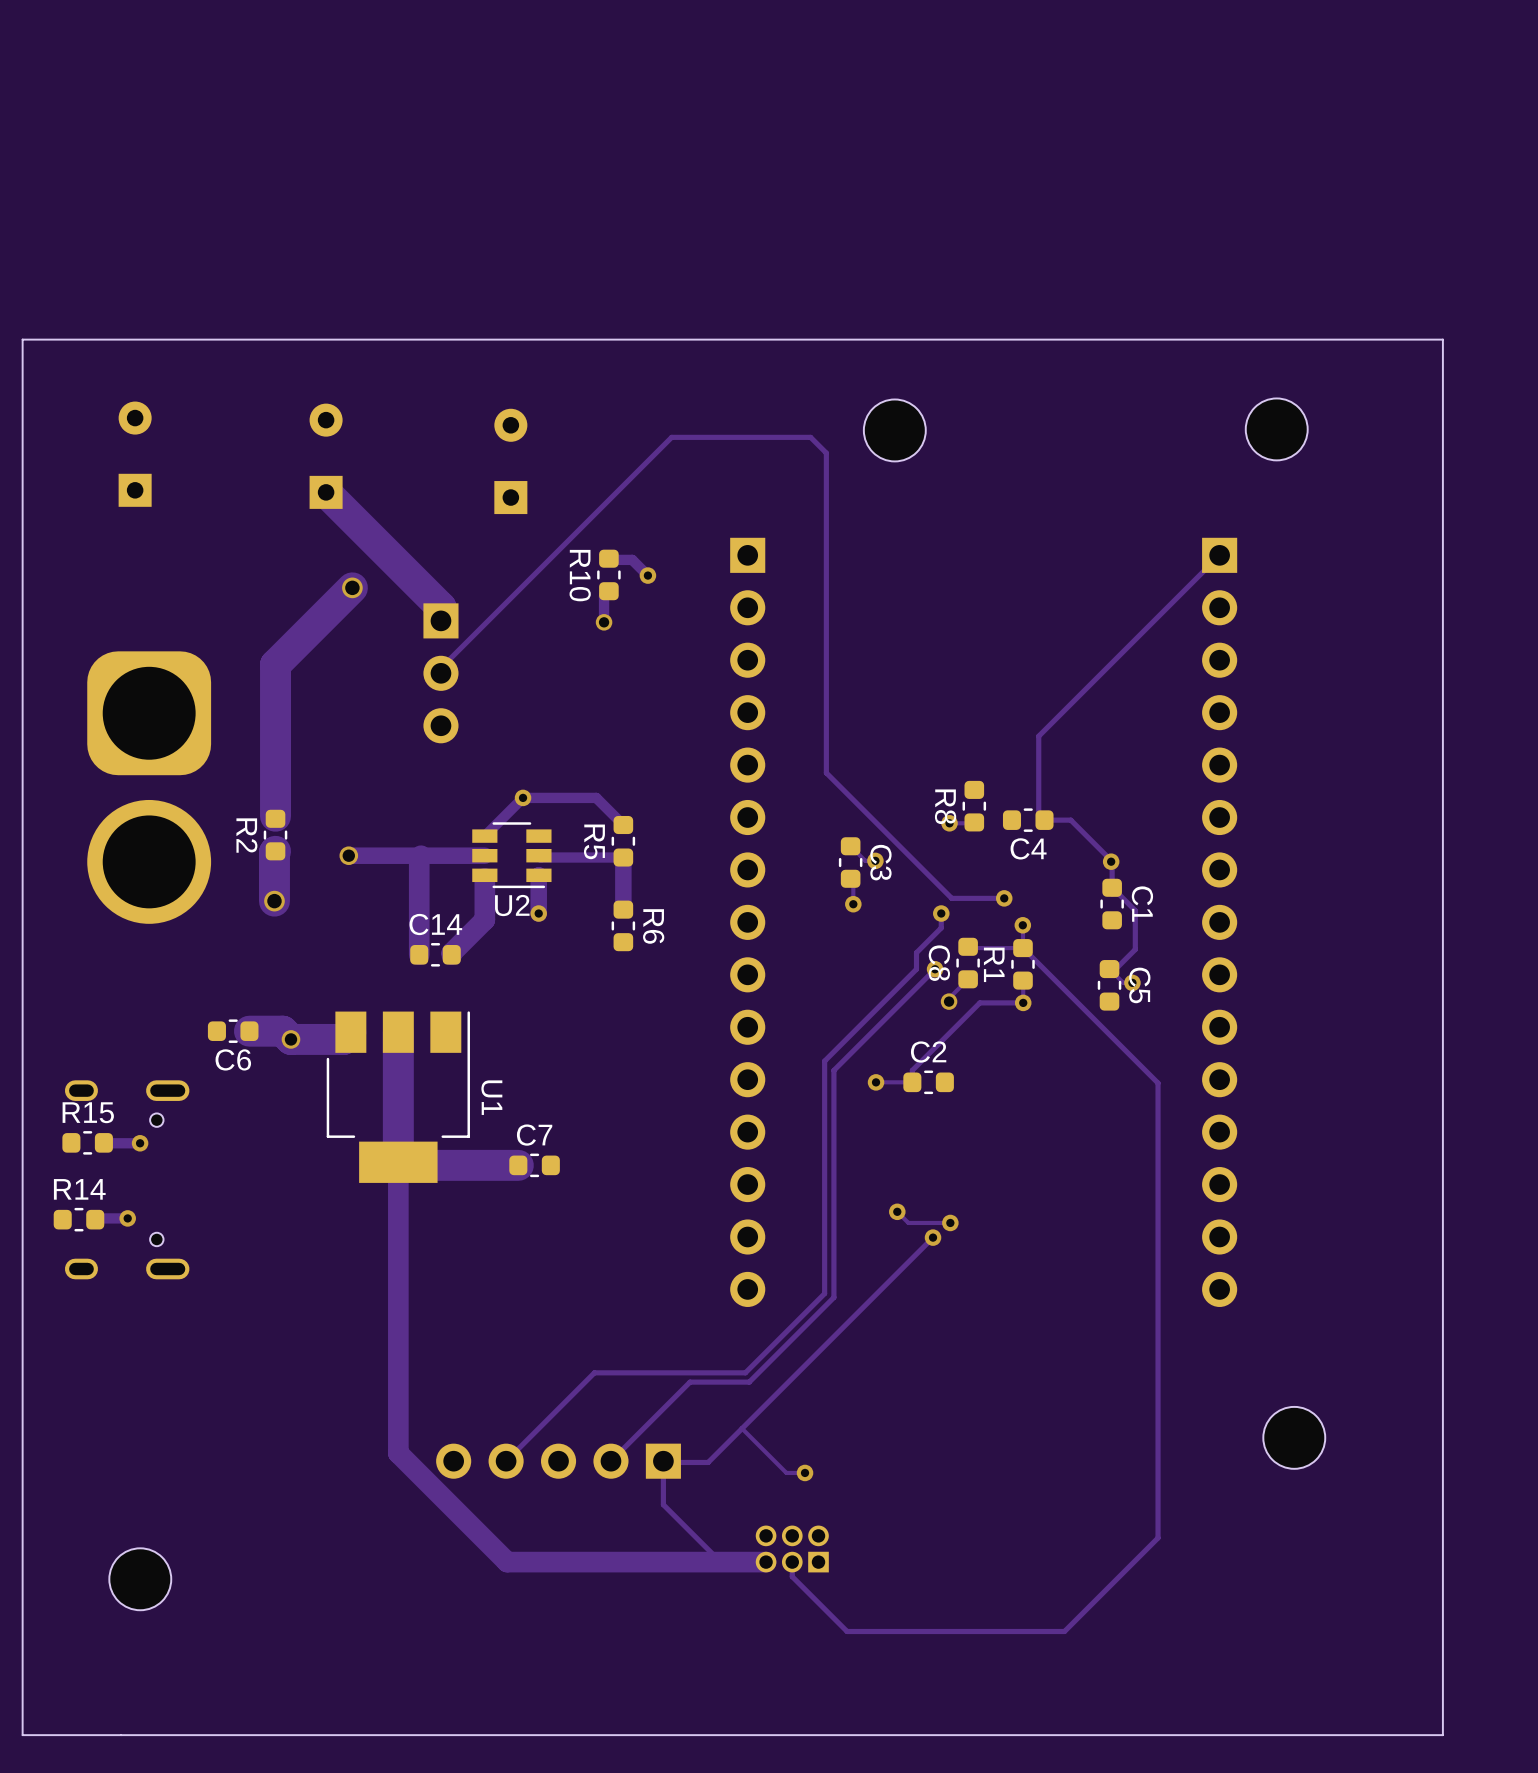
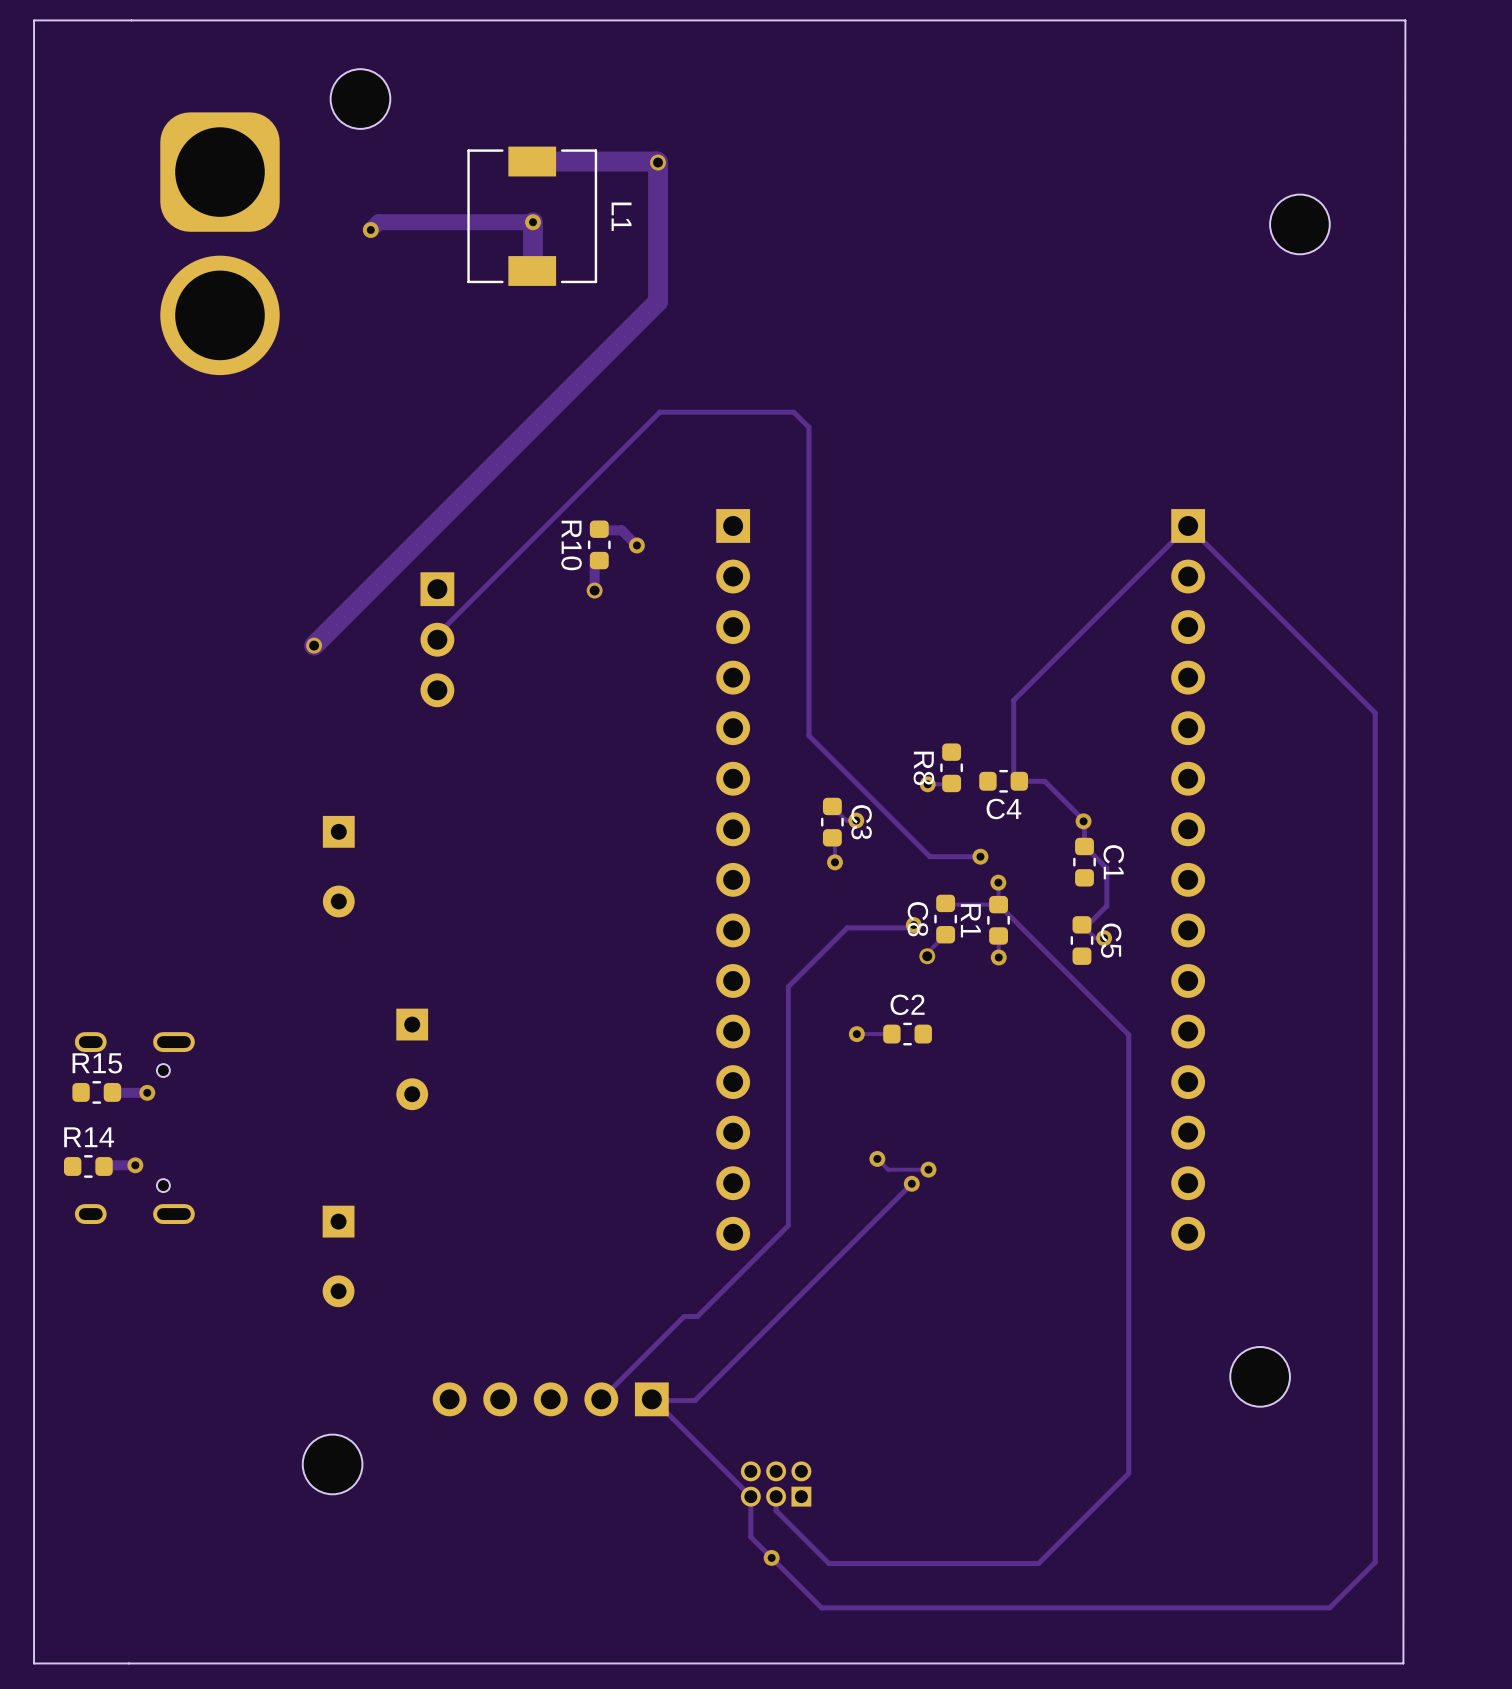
part: none -> (360, 99)
track: none -> (532, 161) (658, 162) (658, 301) (314, 645)
via: none -> (658, 162)
L1: none -> (532, 216)
via: none -> (533, 222)
track: none -> (370, 230) (378, 222) (533, 222) (532, 271)
via: none -> (370, 230)
part: none -> (220, 243)
board edge: (22, 339) (1442, 339) (1442, 1735) -> (34, 317) (34, 20) (1405, 20) (1403, 1663)
part position: (1276, 429) -> (1299, 224)
part: (894, 430) -> none
part: (135, 454) -> none
part: (326, 456) -> none
part: (510, 461) -> none
track: (326, 492) (440, 607) (440, 620) -> none
track: none -> (1188, 525) (1375, 713) (1375, 1562) (1329, 1607) (821, 1607) (750, 1537) (750, 1496) (654, 1400)
track: (352, 587) (275, 664) (275, 816) -> none
via: (352, 587) -> none
via: none -> (314, 645)
part: (149, 787) -> none
via: (523, 797) -> none
track: (623, 825) (596, 797) (523, 797) (484, 836) -> none
R2: (275, 835) -> none
R5: (623, 841) -> none
track: (275, 851) (274, 901) -> none
via: (348, 855) -> none
track: (421, 855) (419, 857) (419, 954) -> none
track: (484, 855) (348, 855) -> none
U2: (511, 855) -> none
track: (538, 855) (540, 857) (623, 857) (623, 909) -> none
track: (538, 875) (538, 913) -> none
track: (484, 878) (484, 919) (451, 954) -> none
via: (274, 901) -> none
part: none -> (338, 866)
via: (538, 913) -> none
track: (941, 913) (941, 927) (916, 952) (916, 969) (824, 1061) (824, 1293) (745, 1372) (594, 1372) (506, 1461) -> none
via: (941, 913) -> none
R6: (623, 925) -> none
C14: (435, 954) -> none
track: (935, 969) (833, 1070) (833, 1297) (749, 1382) (690, 1382) -> (915, 927) (847, 927) (788, 986) (788, 1225) (697, 1316) (684, 1316) (677, 1323)
track: (1023, 1002) (979, 1002) (912, 1070) (912, 1082) -> none
C6: (233, 1031) -> none
track: (249, 1031) (282, 1031) (290, 1039) (343, 1039) (350, 1032) -> none
track: (398, 1032) (398, 1162) -> none
via: (290, 1039) -> none
U1: (398, 1097) -> none
part: none -> (412, 1059)
track: (398, 1162) (401, 1165) (518, 1165) -> none
track: (398, 1162) (398, 1453) (507, 1562) (766, 1562) (720, 1562) (663, 1504) (663, 1461) -> none
C7: (534, 1165) -> none
part: none -> (338, 1256)
track: (742, 1428) (786, 1472) (805, 1472) -> none
via: (805, 1472) -> none
part position: (140, 1579) -> (332, 1464)
via: none -> (771, 1557)

